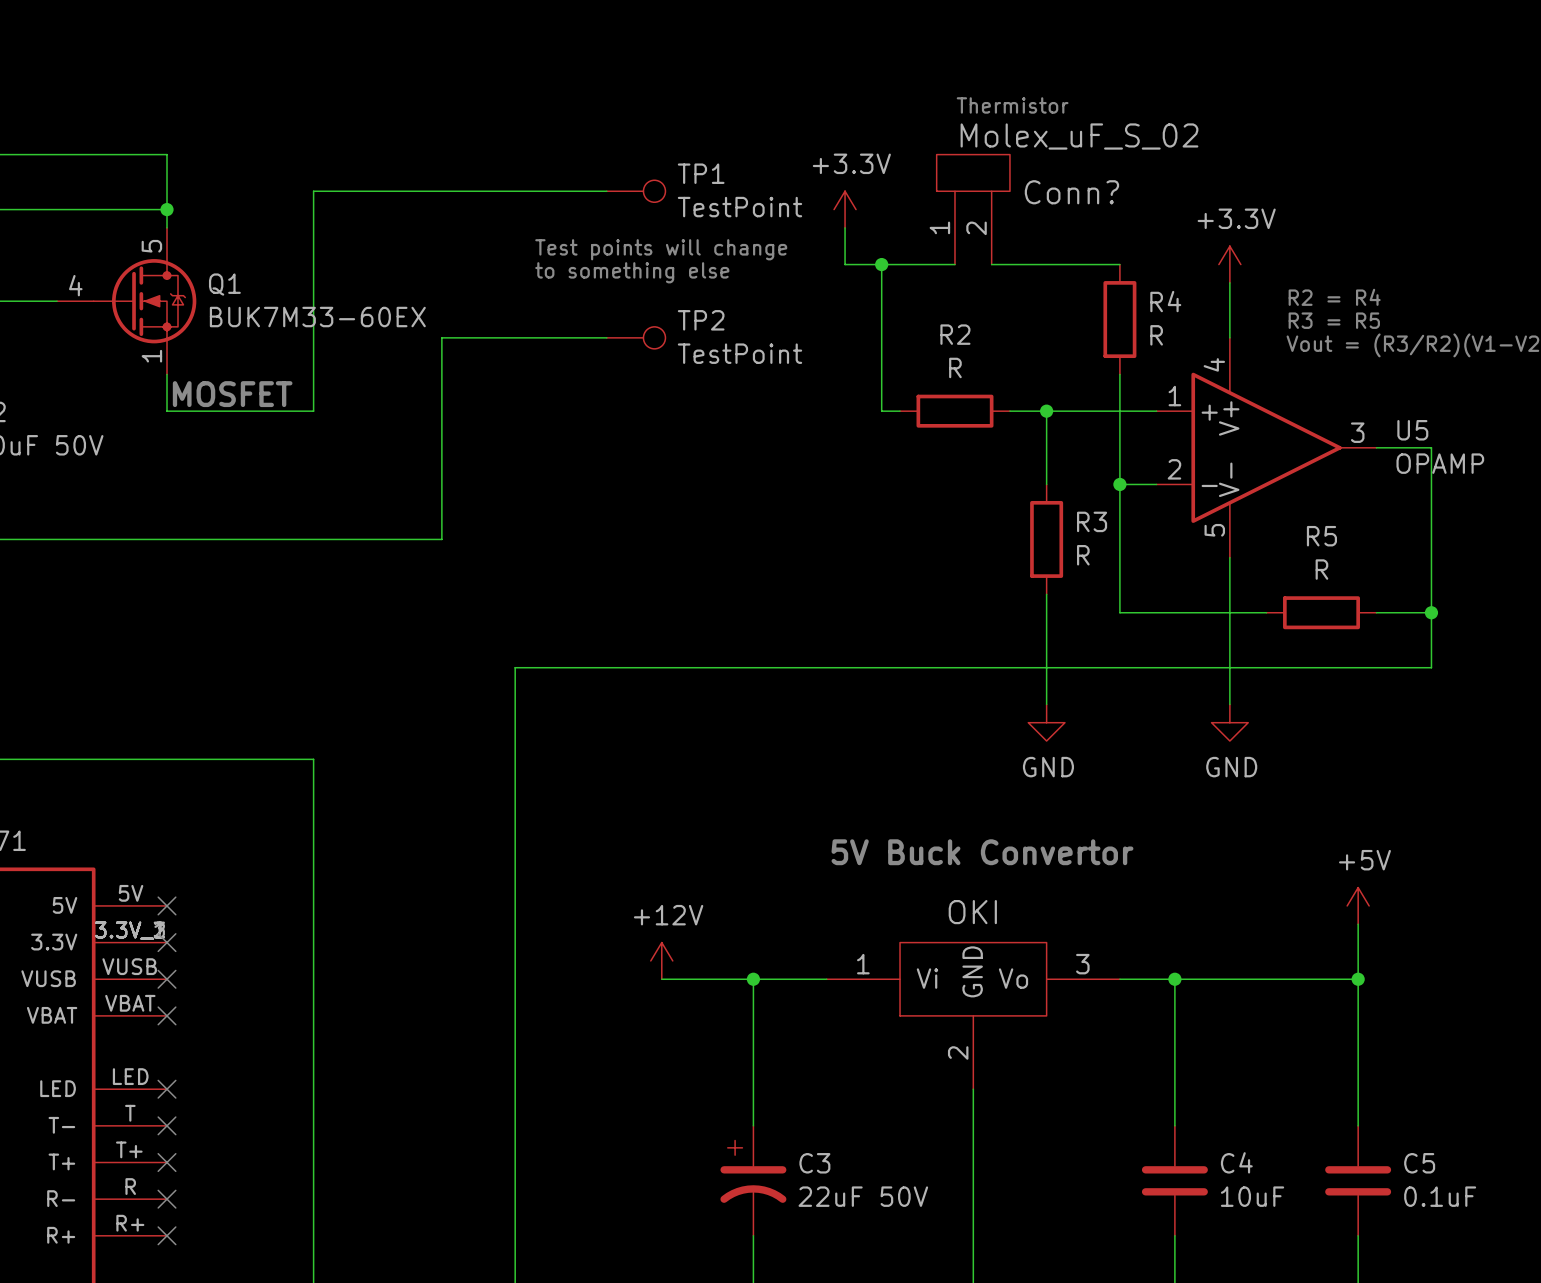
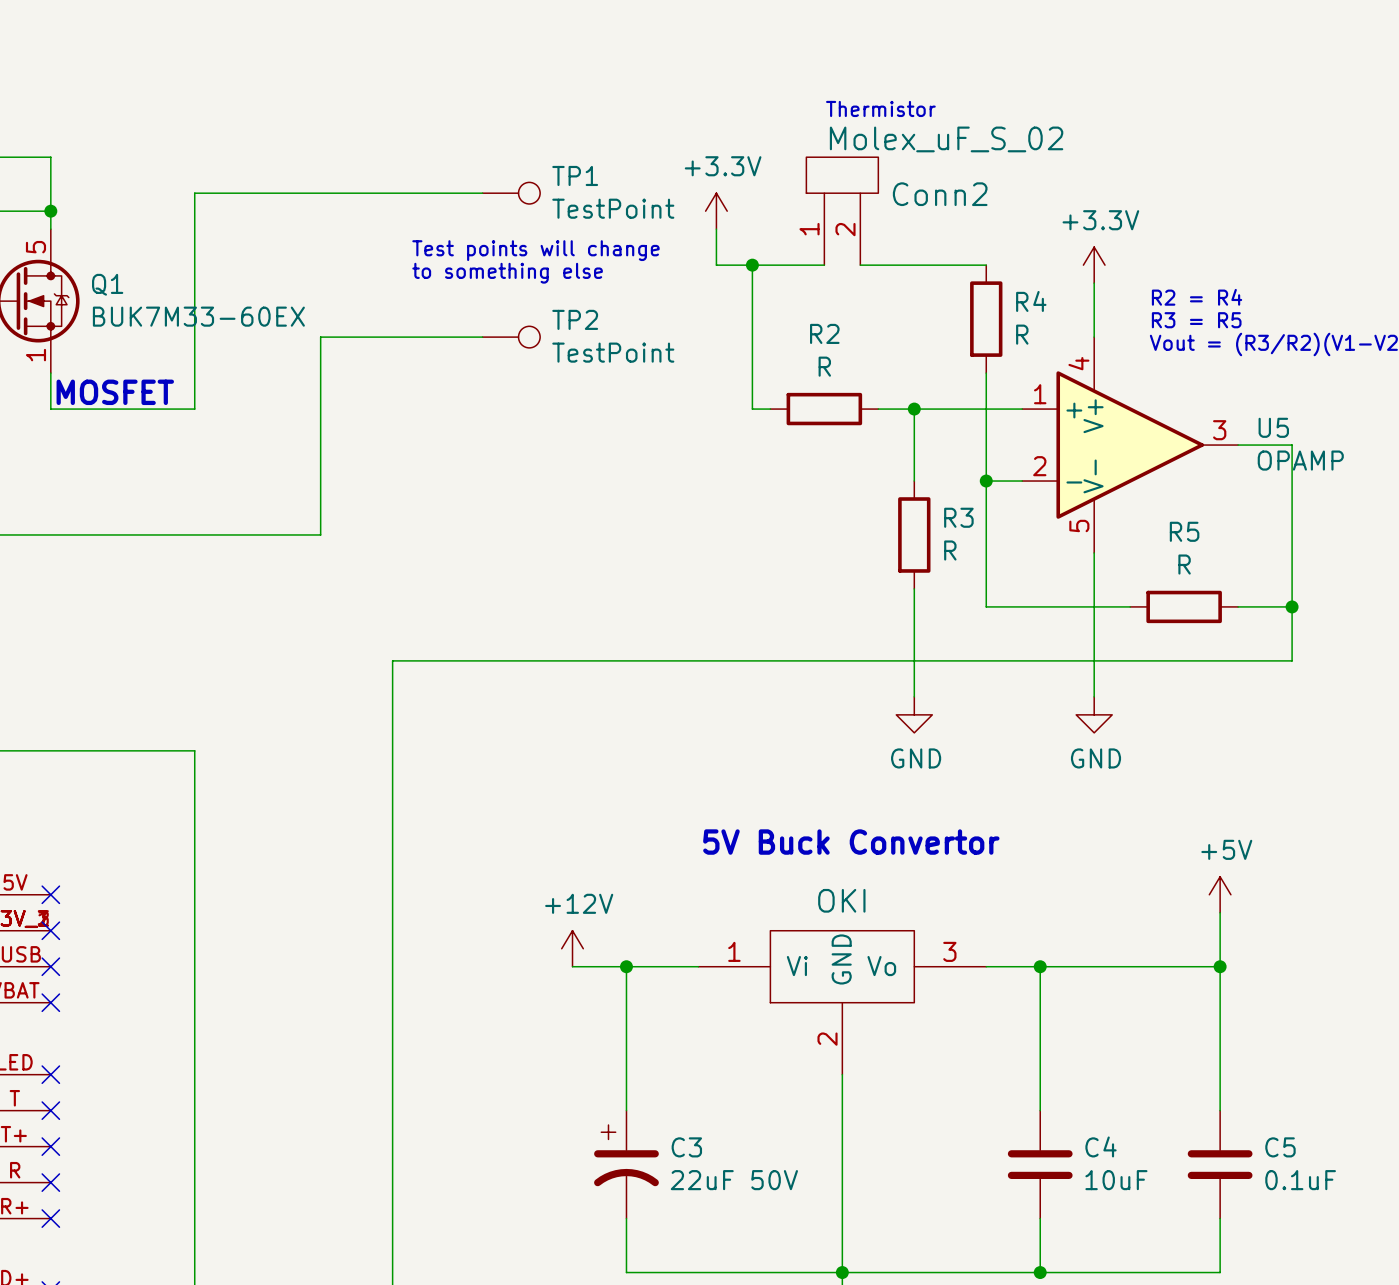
Conn? name: Conn? (1071, 192) -> Conn2 (940, 194)
power symbol position: +12V (661, 960) -> +12V (572, 948)
wire: (661, 979) (698, 979) -> none

